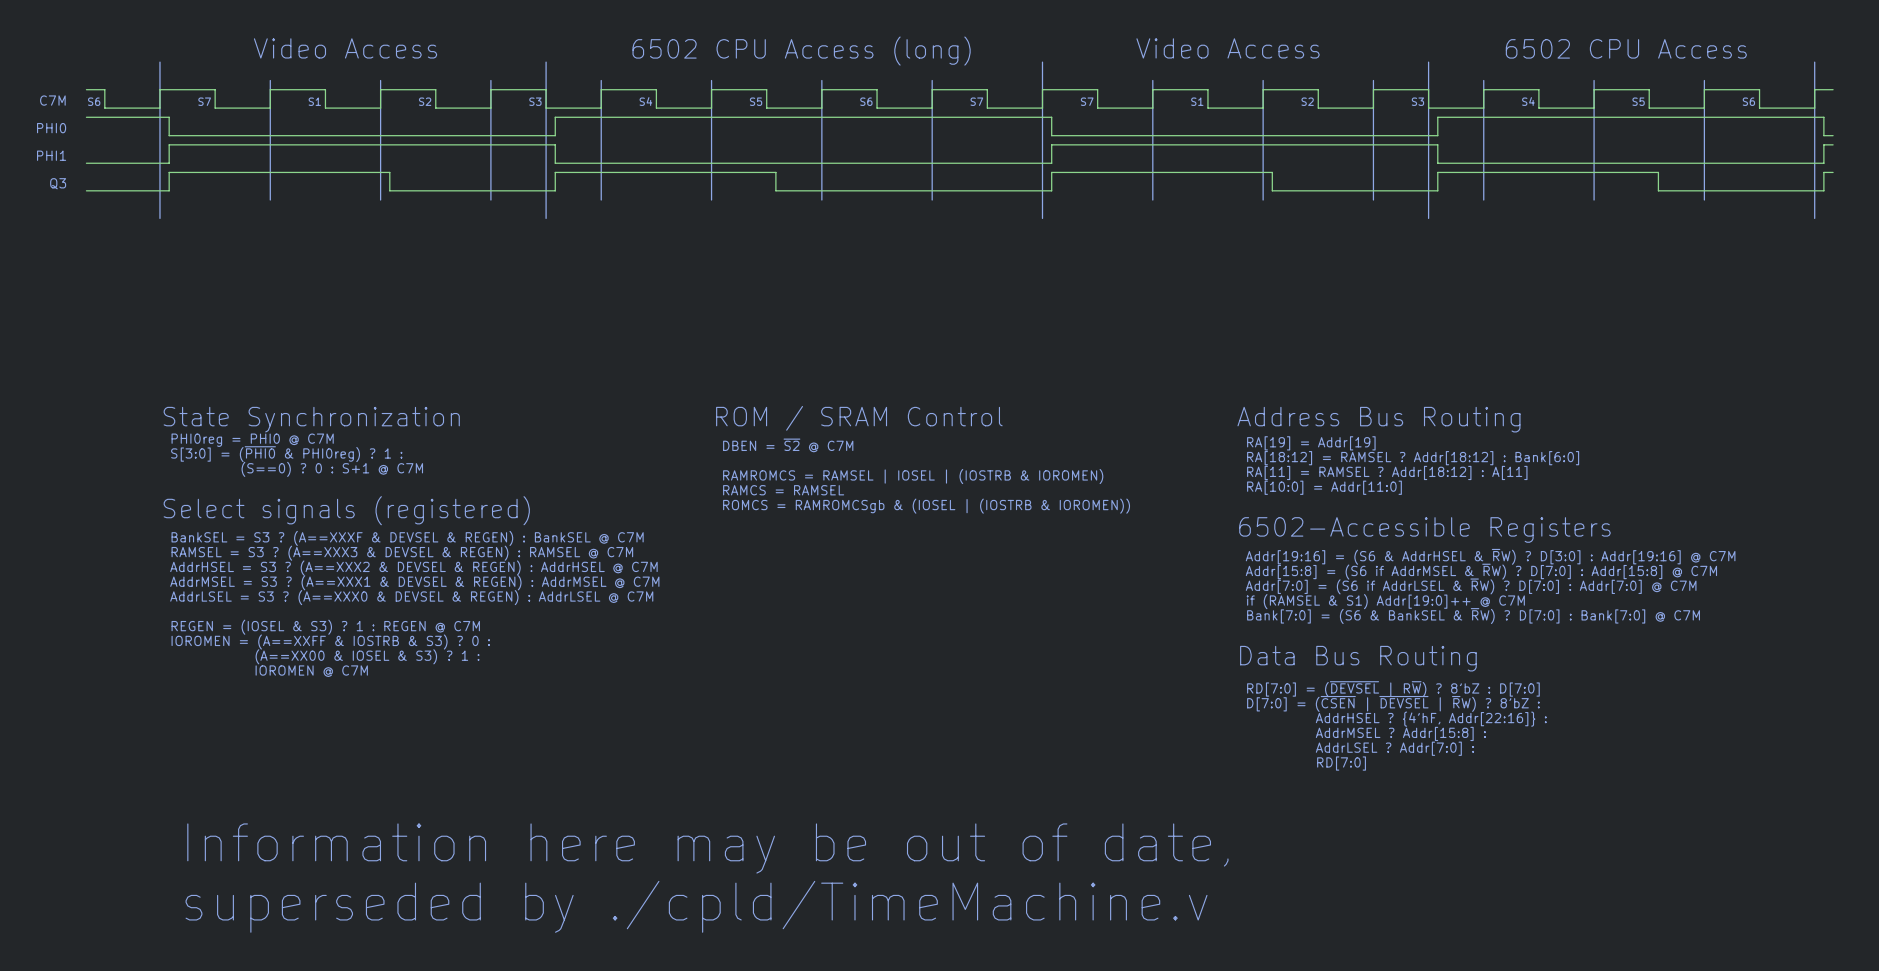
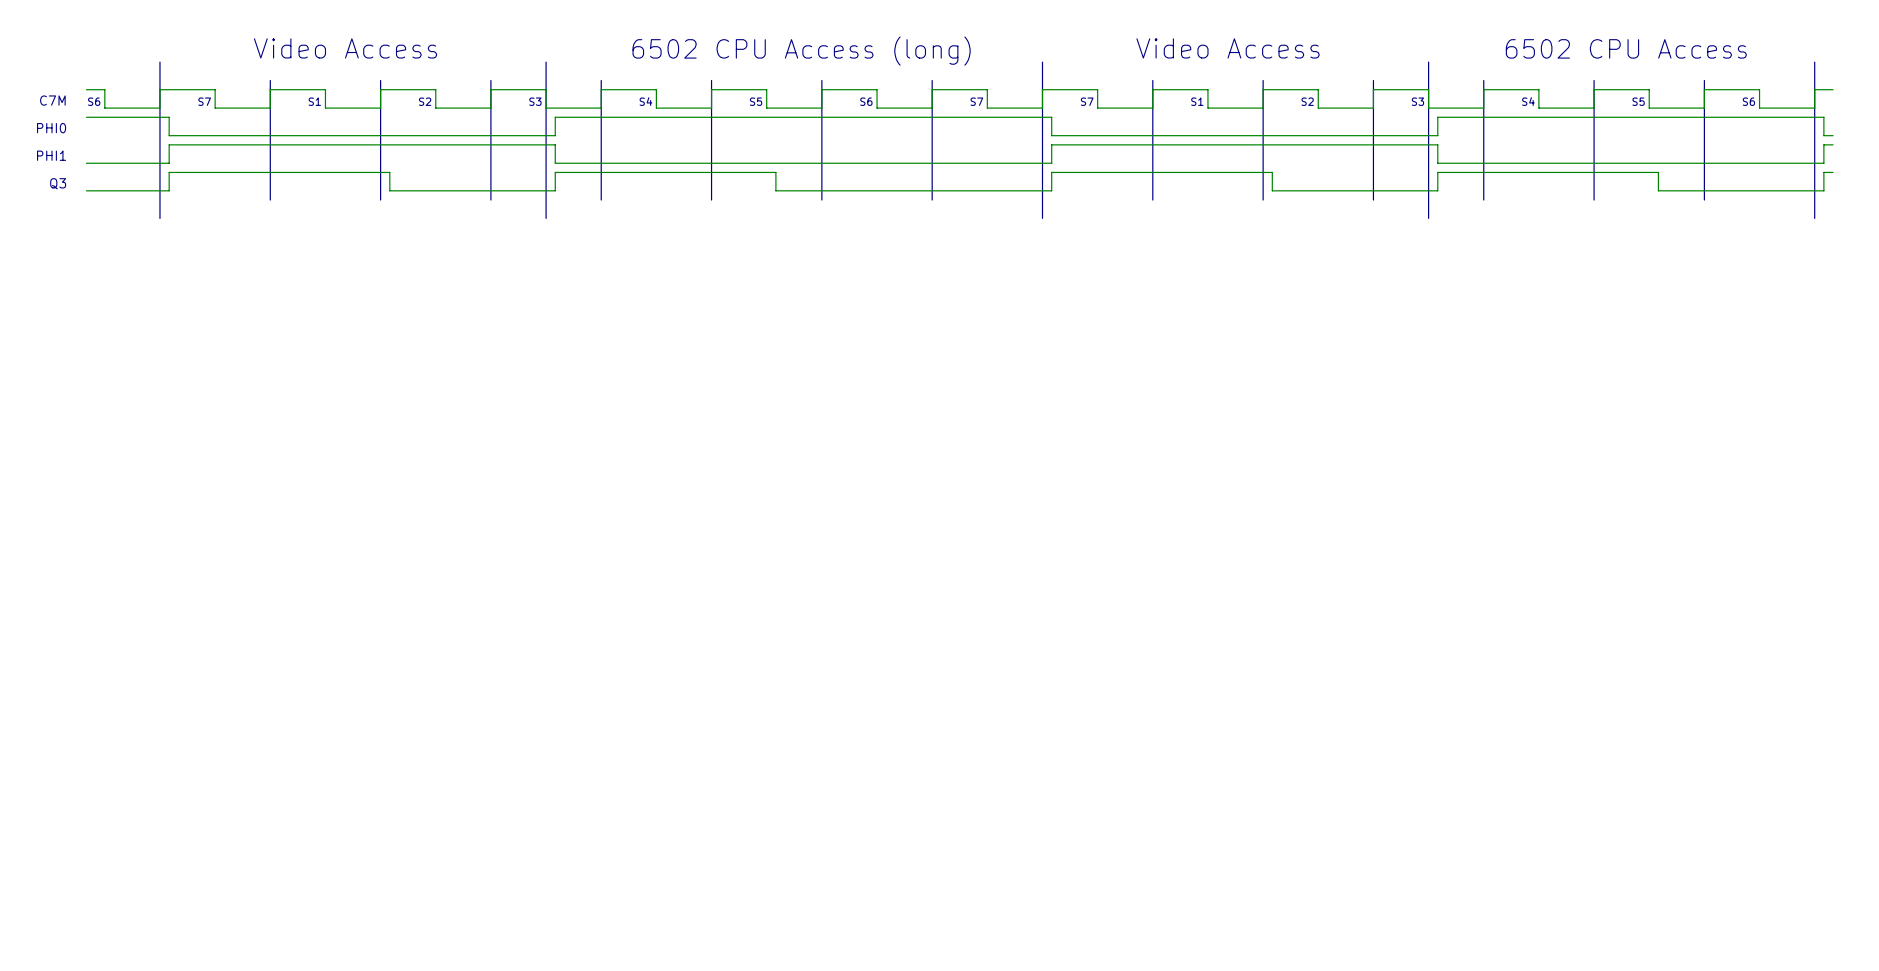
text: ROM / SRAM Control (859, 418) -> none
text: State Synchronization (311, 419) -> none
text: Address Bus Routing (1378, 419) -> none
text: PHI0reg = PHI0 @ C7M (252, 440) -> none
text: RA[19] = Addr[19] (1311, 443) -> none
text: DBEN = ~{S2} @ C7M (788, 445) -> none
text: S[3:0] = (~{PHI0} & PHI0reg) ? 1 : (286, 454) -> none
text: RA[18:12] = RAMSEL ? Addr[18:12] : Bank[6:0] (1413, 458) -> none
text: (S==0) ? 0 : S+1 @ C7M (332, 469) -> none
text: RA[11] = RAMSEL ? Addr[18:12] : A[11] (1387, 472) -> none
text: RAMROMCS = RAMSEL | IOSEL | (IOSTRB & IOROMEN) (913, 476) -> none
text: RA[10:0] = Addr[11:0] (1324, 487) -> none
text: RAMCS = RAMSEL (783, 490) -> none
text: ROMCS = RAMROMCSgb & (IOSEL | (IOSTRB & IOROMEN)) (926, 506) -> none
text: Select signals (registered) (346, 510) -> none
text: 6502-Accessible Registers (1424, 529) -> none
text: BankSEL = S3 ? (A==XXXF & DEVSEL & REGEN) : BankSEL @ C7M (407, 538) -> none
text: RAMSEL = S3 ? (A==XXX3 & DEVSEL & REGEN) : RAMSEL @ C7M (402, 553) -> none
text: Addr[19:16] = (S6 & AddrHSEL & ~{R}W) ? D[3:0] : Addr[19:16] @ C7M (1490, 556) -> none
text: AddrHSEL = S3 ? (A==XXX2 & DEVSEL & REGEN) : AddrHSEL @ C7M (413, 568) -> none
text: Addr[15:8] = (S6 if AddrMSEL & ~{R}W) ? D[7:0] : Addr[15:8] @ C7M (1481, 571) -> none
text: AddrMSEL = S3 ? (A==XXX1 & DEVSEL & REGEN) : AddrMSEL @ C7M (414, 582) -> none
text: Addr[7:0] = (S6 if AddrLSEL & ~{R}W) ? D[7:0] : Addr[7:0] @ C7M (1471, 586) -> none
text: AddrLSEL = S3 ? (A==XXX0 & DEVSEL & REGEN) : AddrLSEL @ C7M (411, 597) -> none
text: if (RAMSEL & S1) Addr[19:0]++ @ C7M (1385, 601) -> none
text: Bank[7:0] = (S6 & BankSEL & ~{R}W) ? D[7:0] : Bank[7:0] @ C7M (1473, 616) -> none
text: REGEN = (IOSEL & S3) ? 1 : REGEN @ C7M (325, 627) -> none
text: IOROMEN = (A==XXFF & IOSTRB & S3) ? 0 : (330, 642) -> none
text: (A==XX00 & IOSEL & S3) ? 1 : (367, 656) -> none
text: Data Bus Routing (1358, 658) -> none
text: IOROMEN @ C7M (311, 671) -> none
text: RD[7:0] = (~{DEVSEL} | R~{W}) ? 8’bZ : D[7:0] (1393, 689) -> none
text: D[7:0] = (~{CSEN} | ~{DEVSEL} | ~{R}W) ? 8’bZ : (1393, 703) -> none
text: AddrHSEL ? {4’hF, Addr[22:16]} : (1431, 719) -> none
text: AddrMSEL ? Addr[15:8] : (1400, 733) -> none
text: AddrLSEL ? Addr[7:0] : (1394, 748) -> none
text: RD[7:0] (1341, 763) -> none
text: Information here may be out of date, (707, 848) -> none
text: superseded by ./cpld/TimeMachine.v (696, 906) -> none

